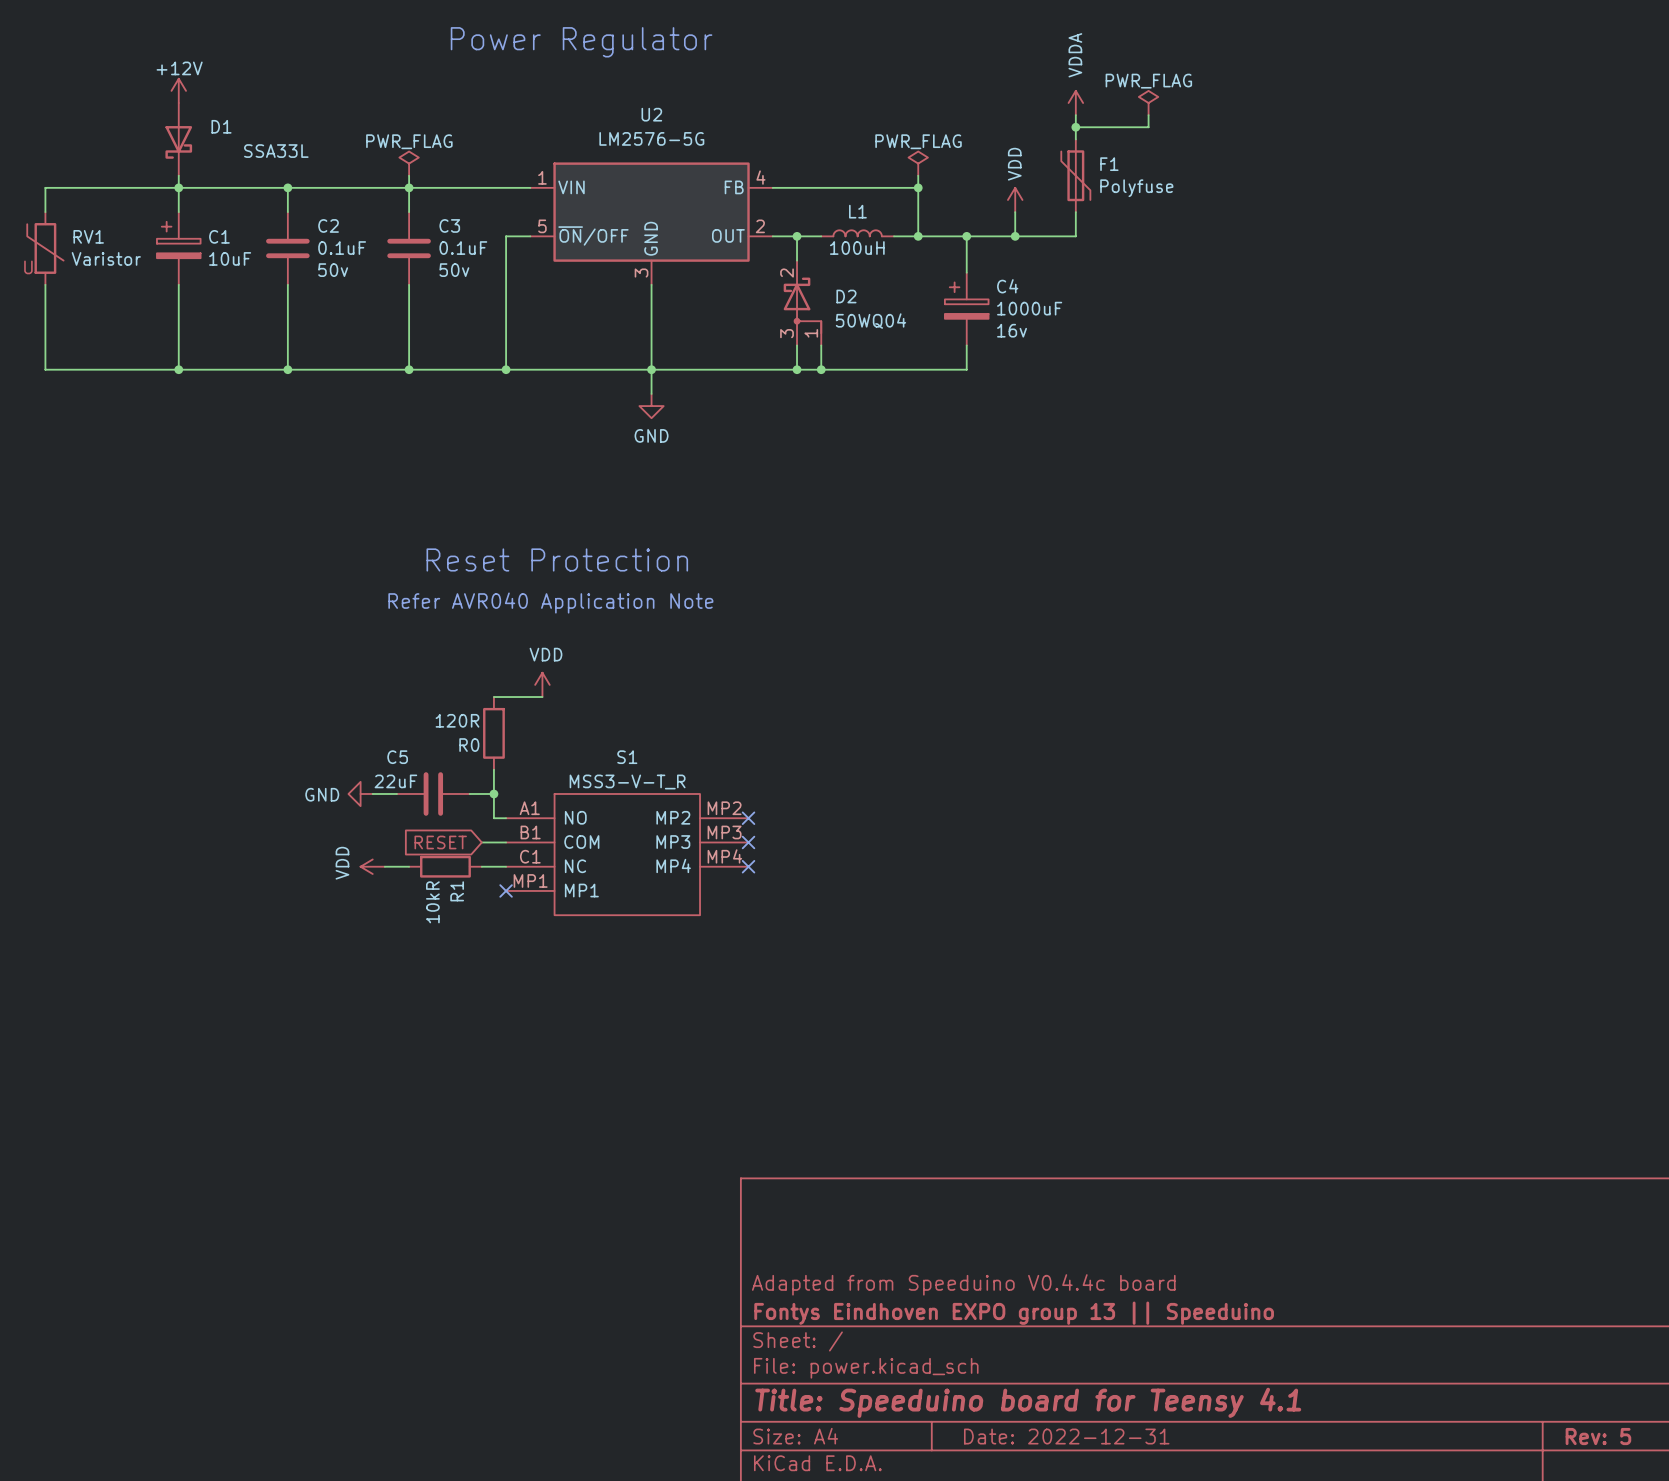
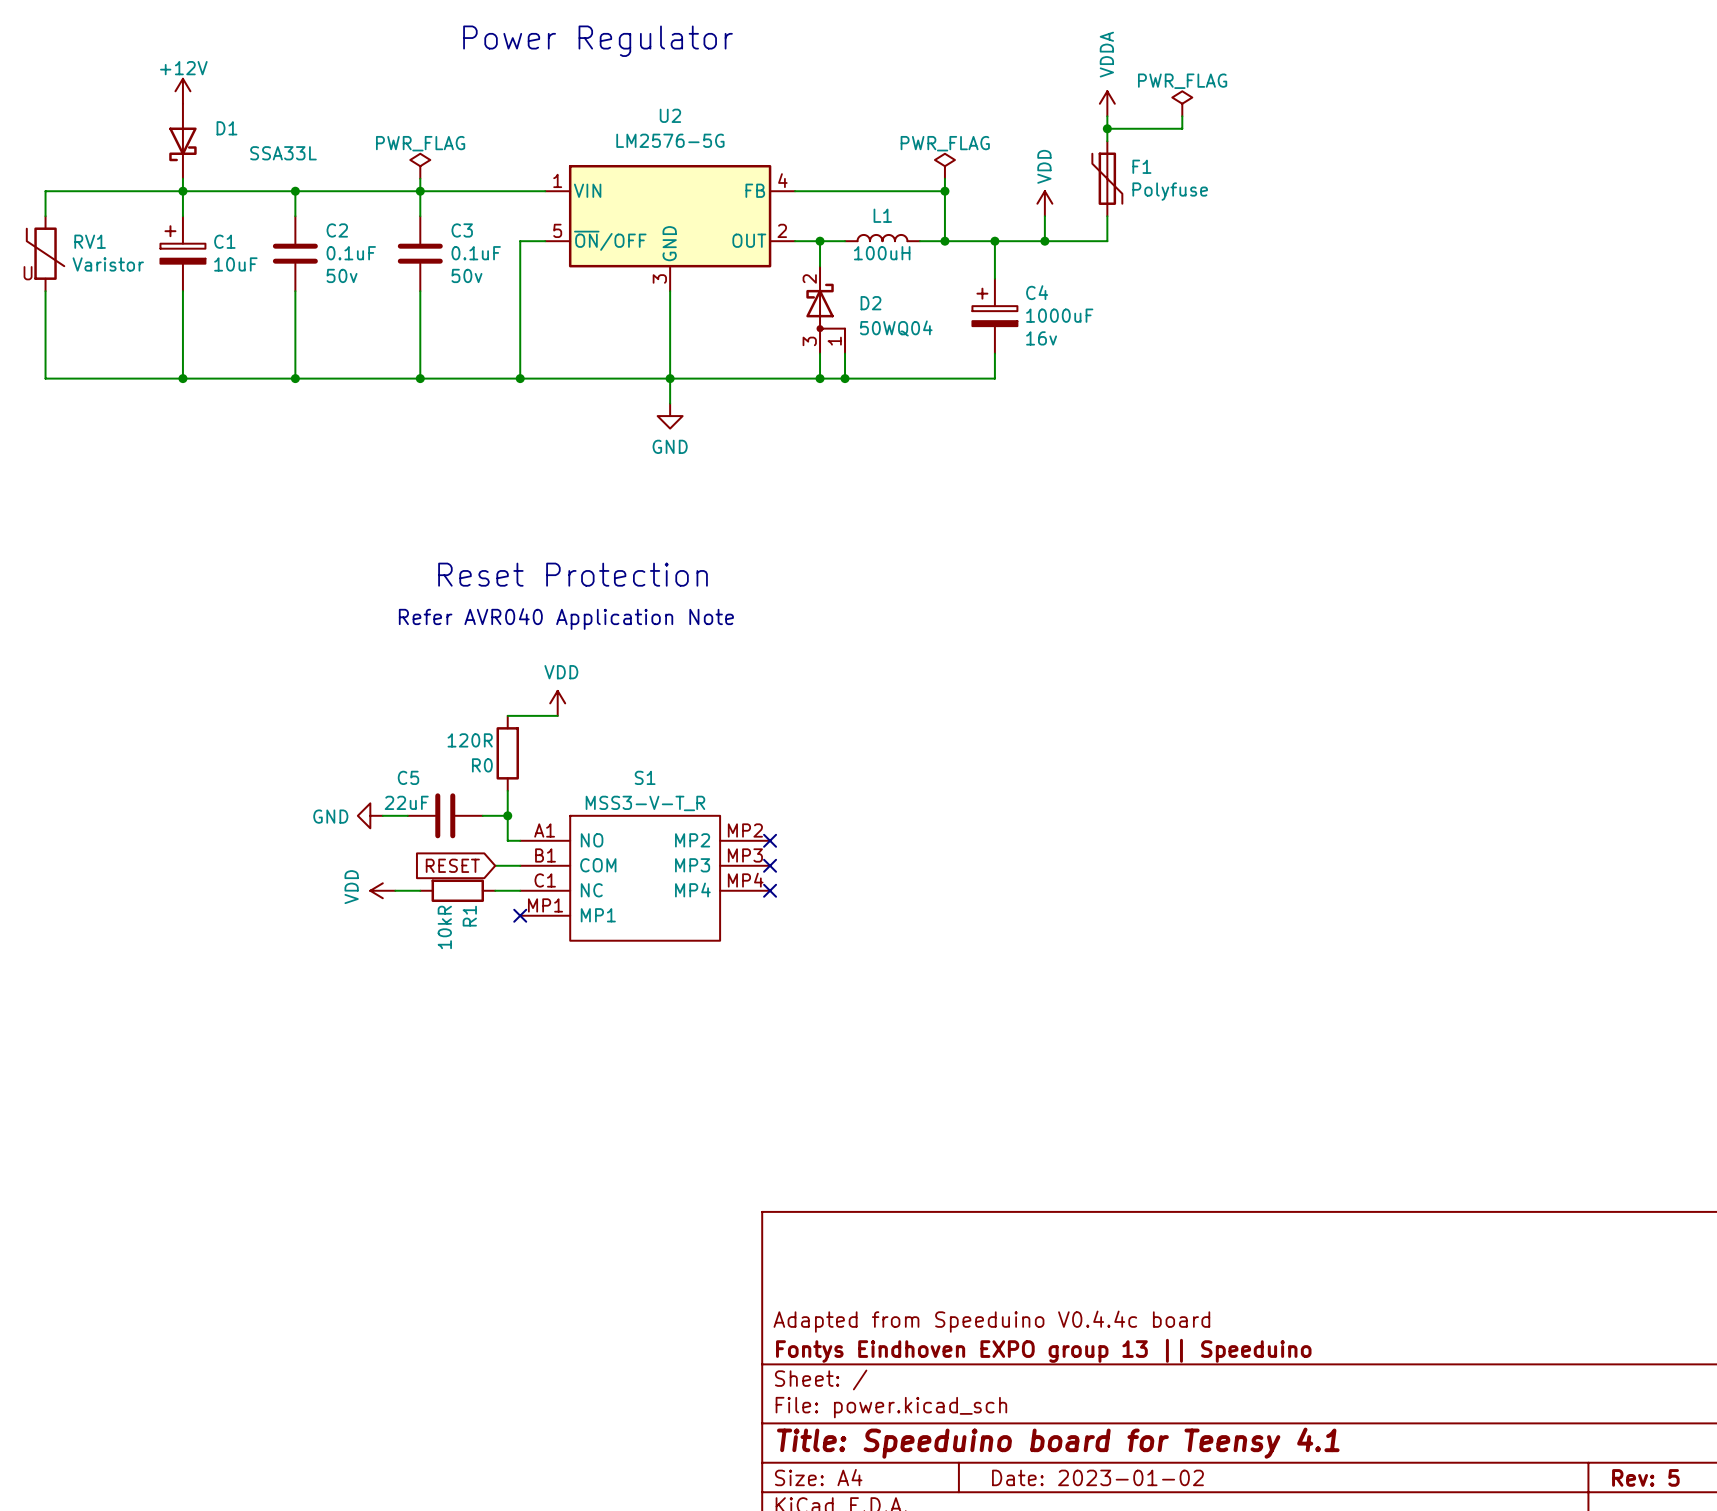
title block: Date: 2022-12-31 (1066, 1436) -> Date: 2023-01-02 (1097, 1477)

